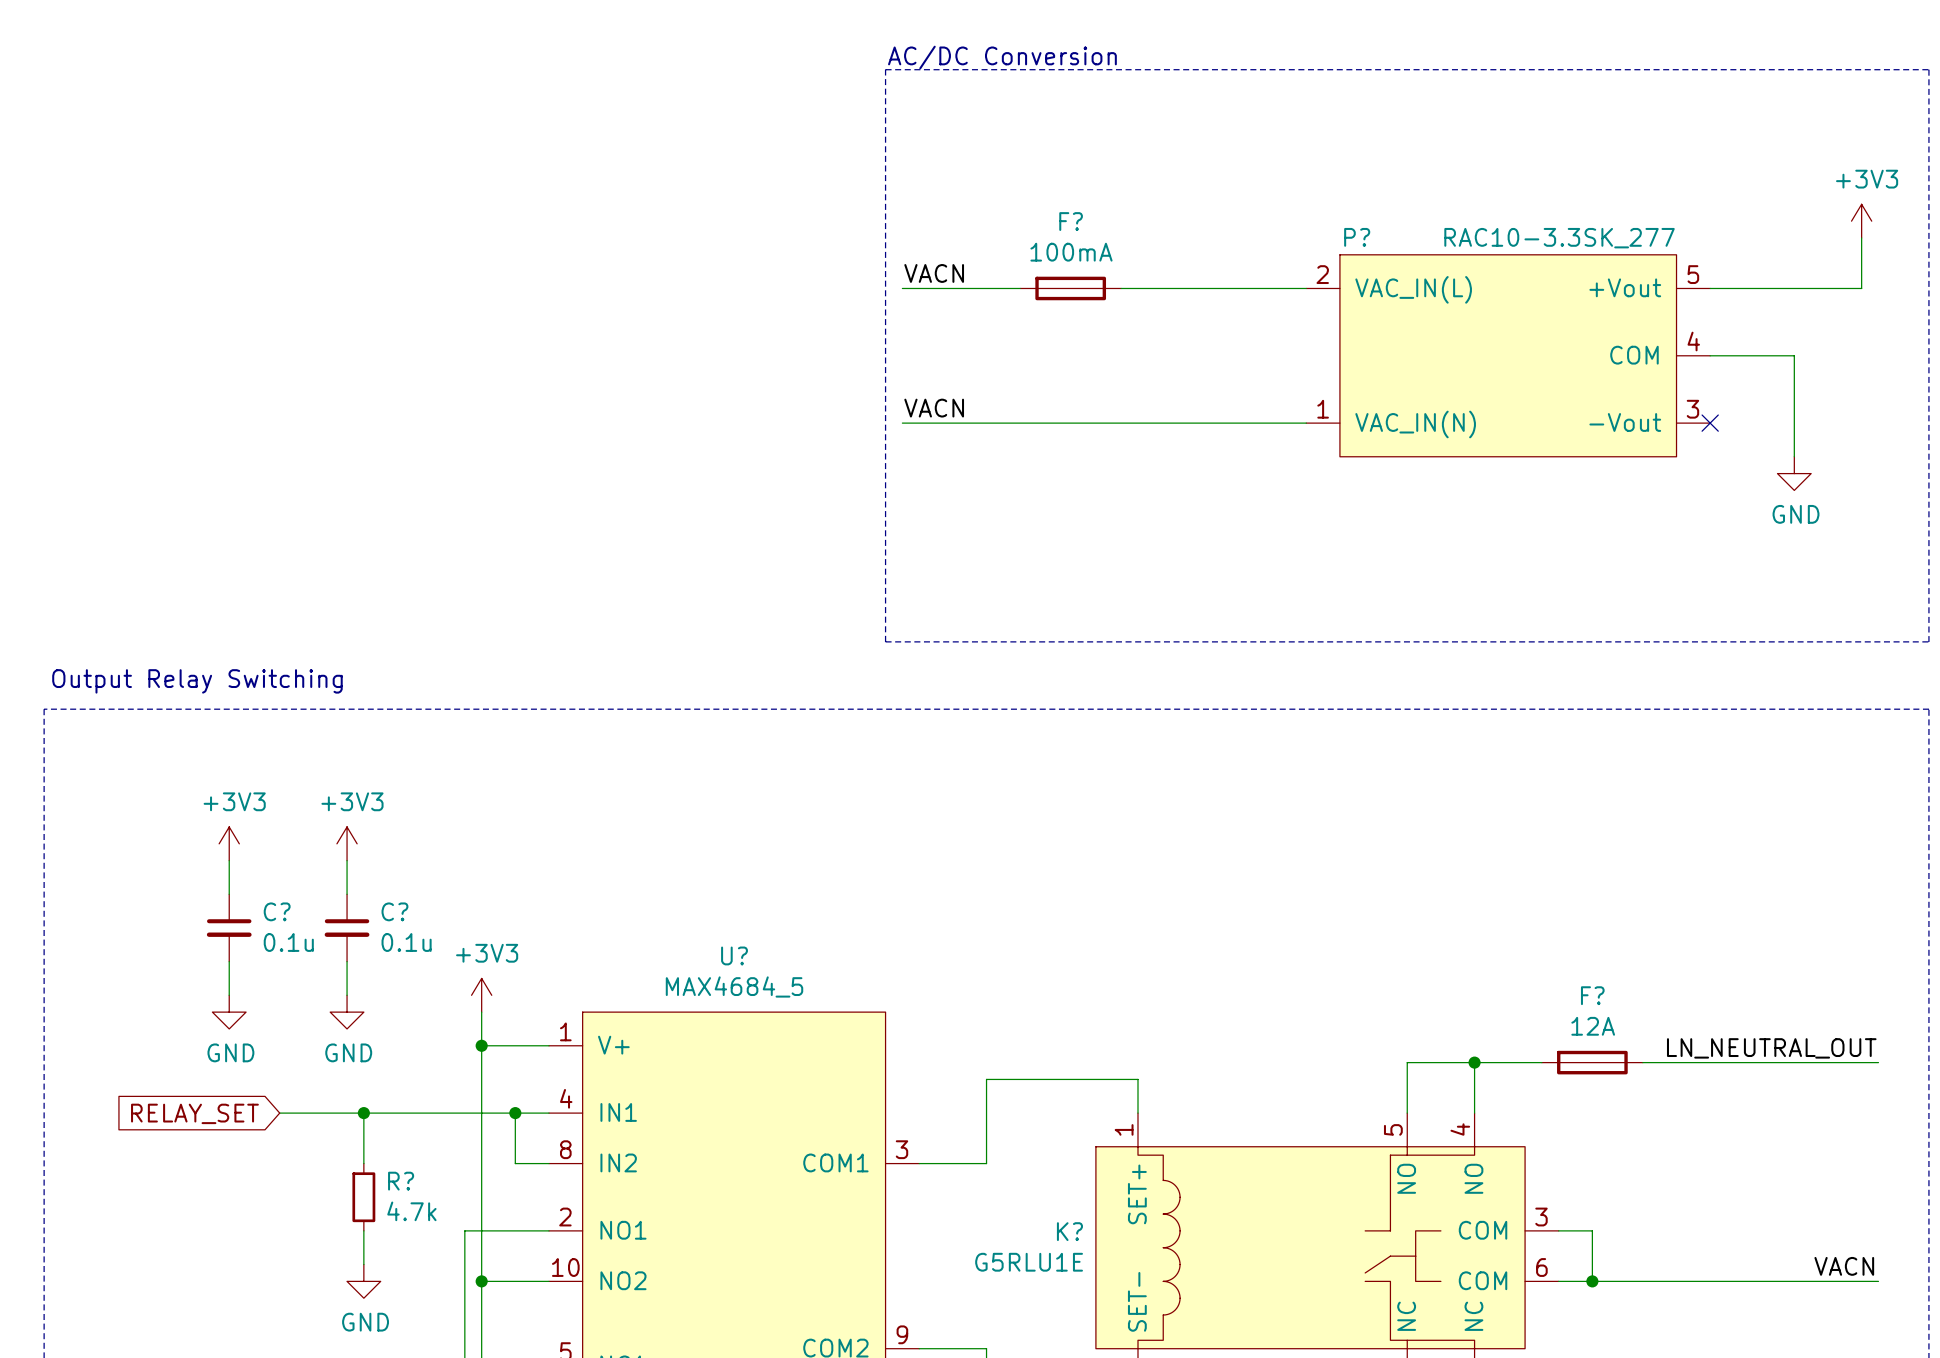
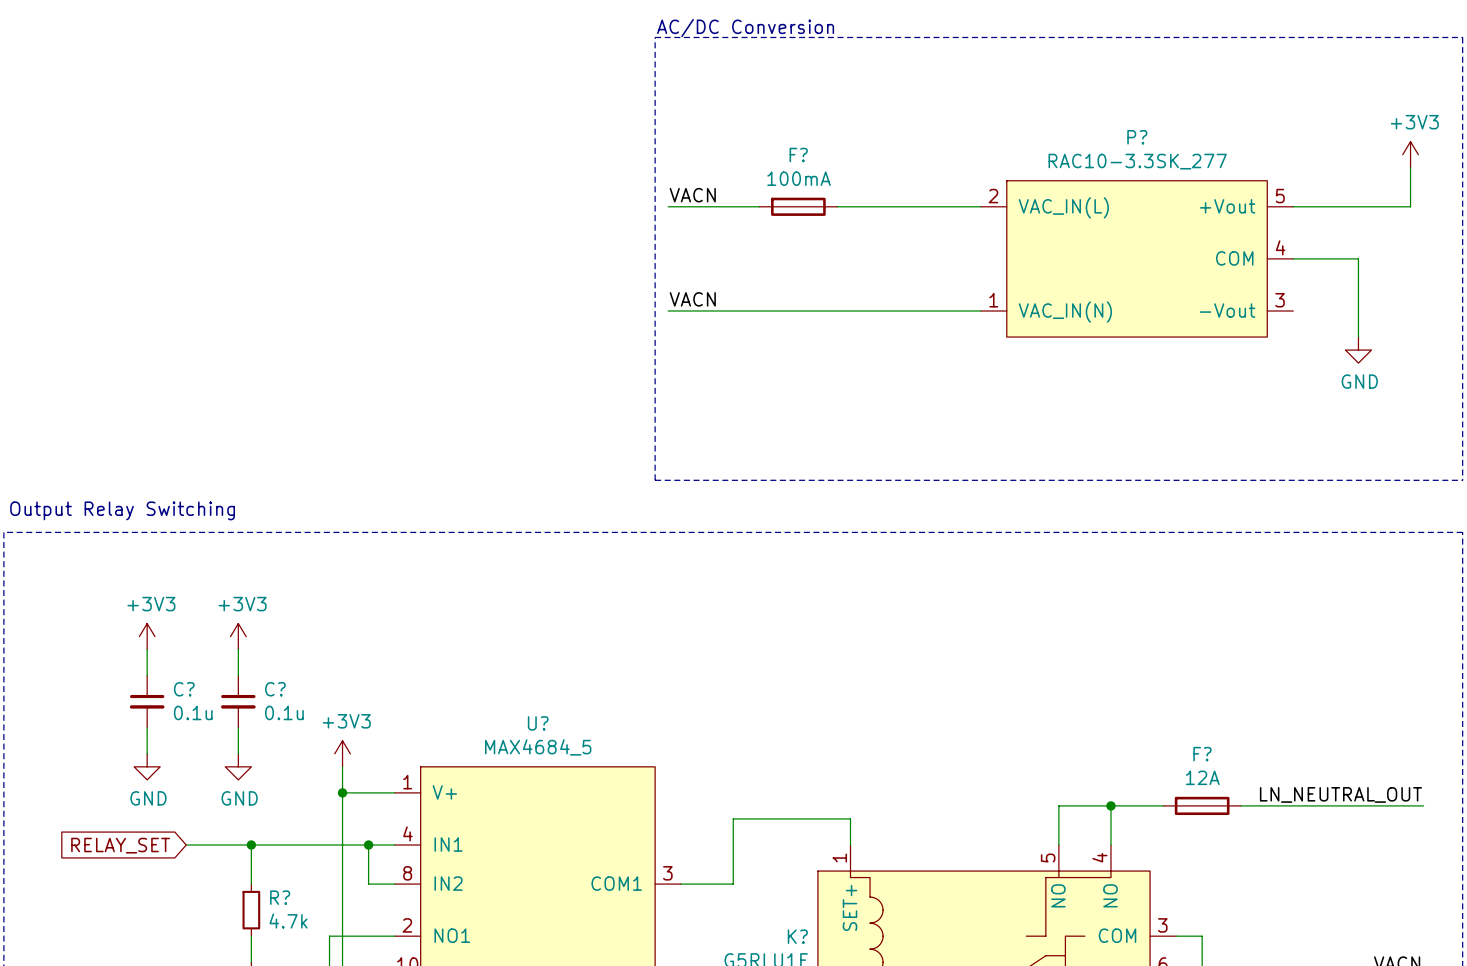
P? name position: P? (1357, 237) -> P? (1137, 137)
P? value position: RAC10-3.3SK_277 (1559, 238) -> RAC10-3.3SK_277 (1137, 161)
no-connect mark: (1710, 423) -> none

